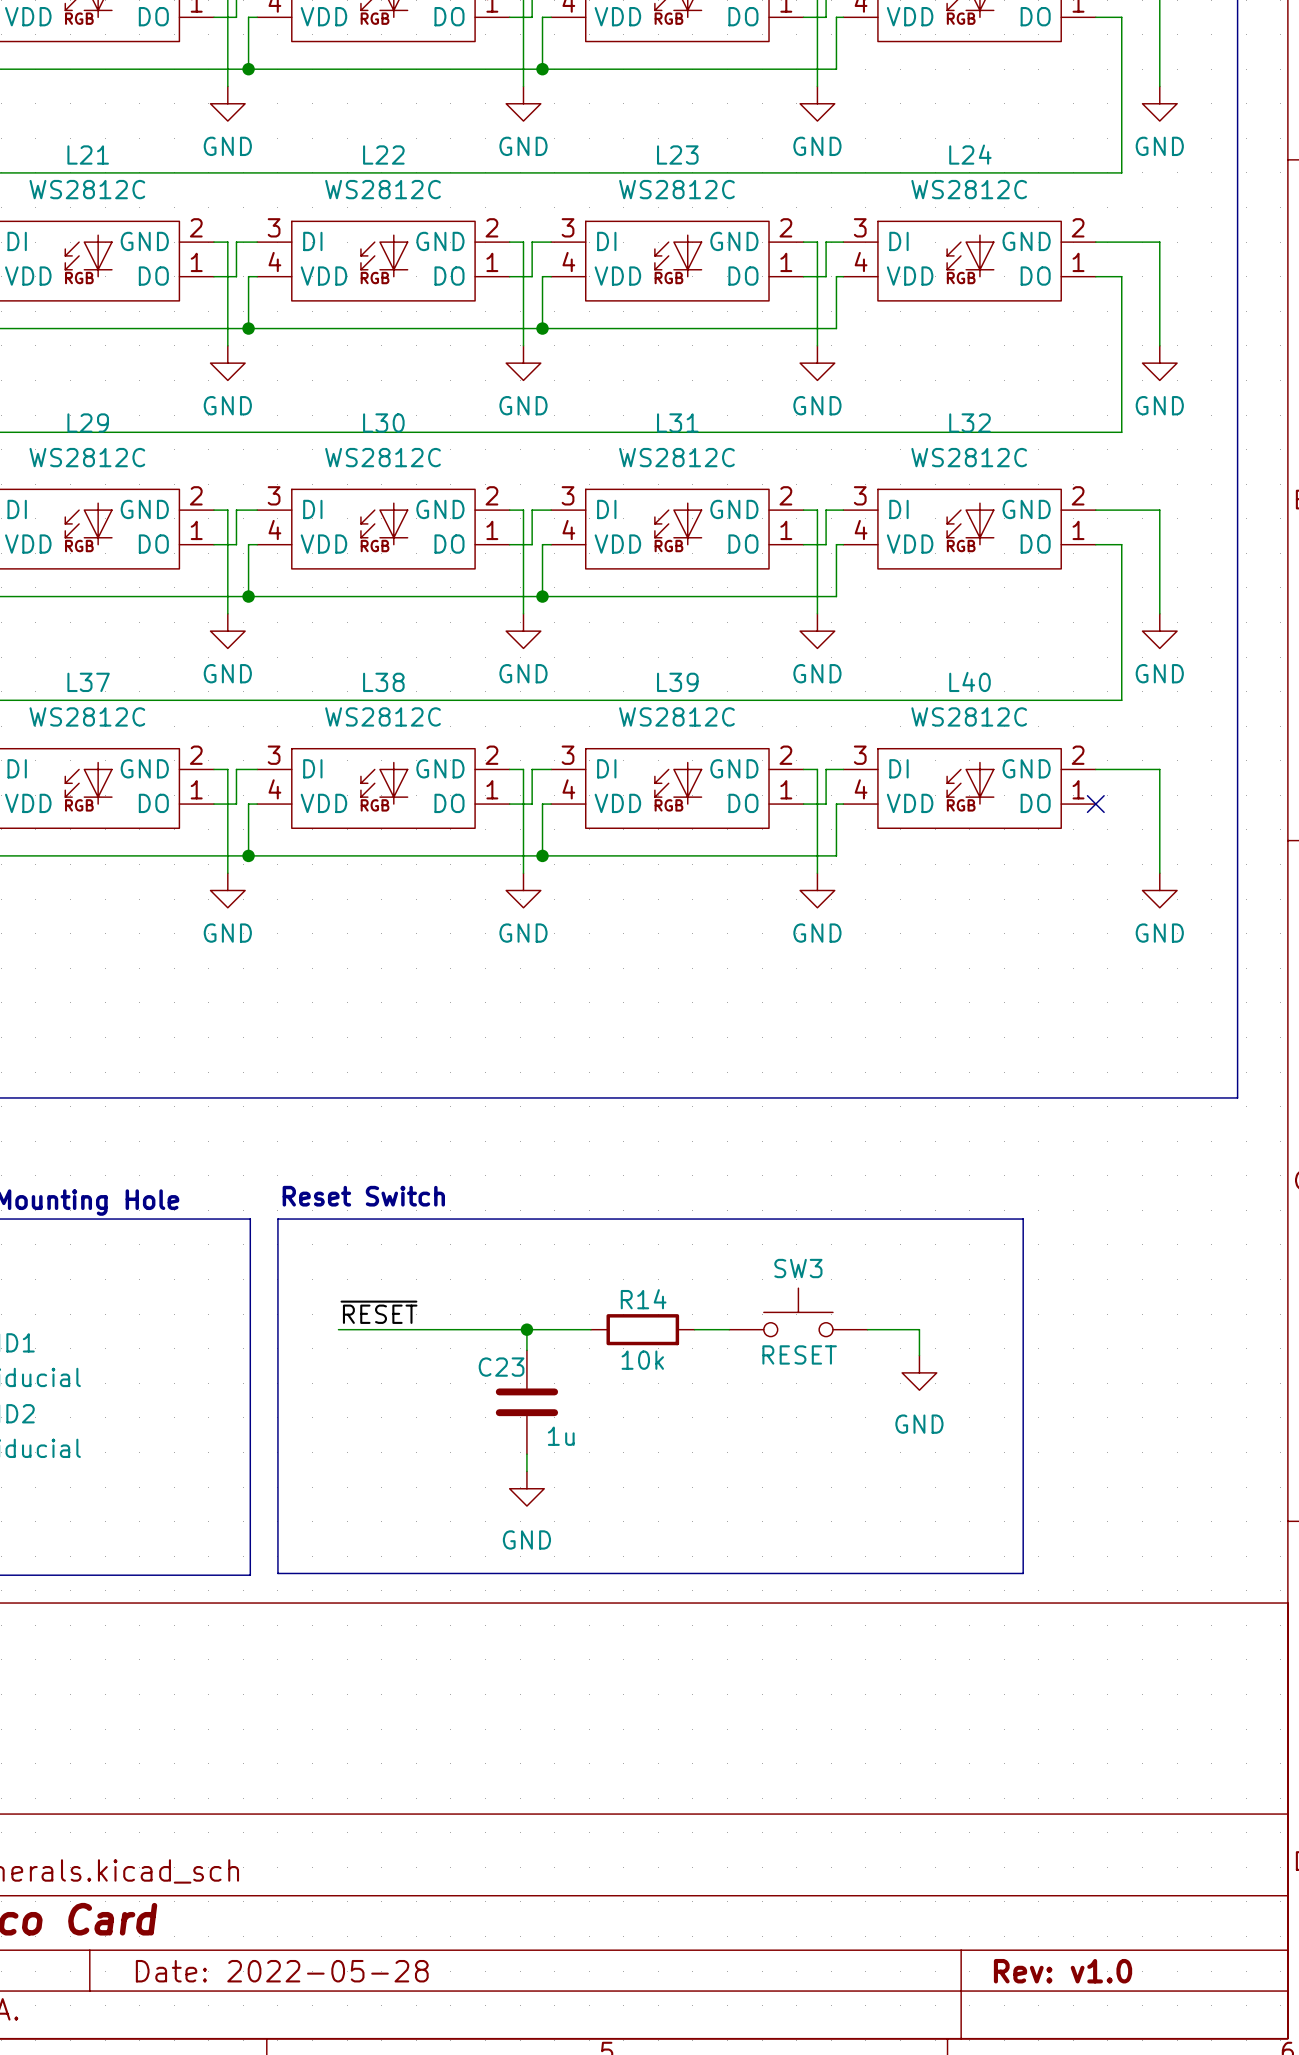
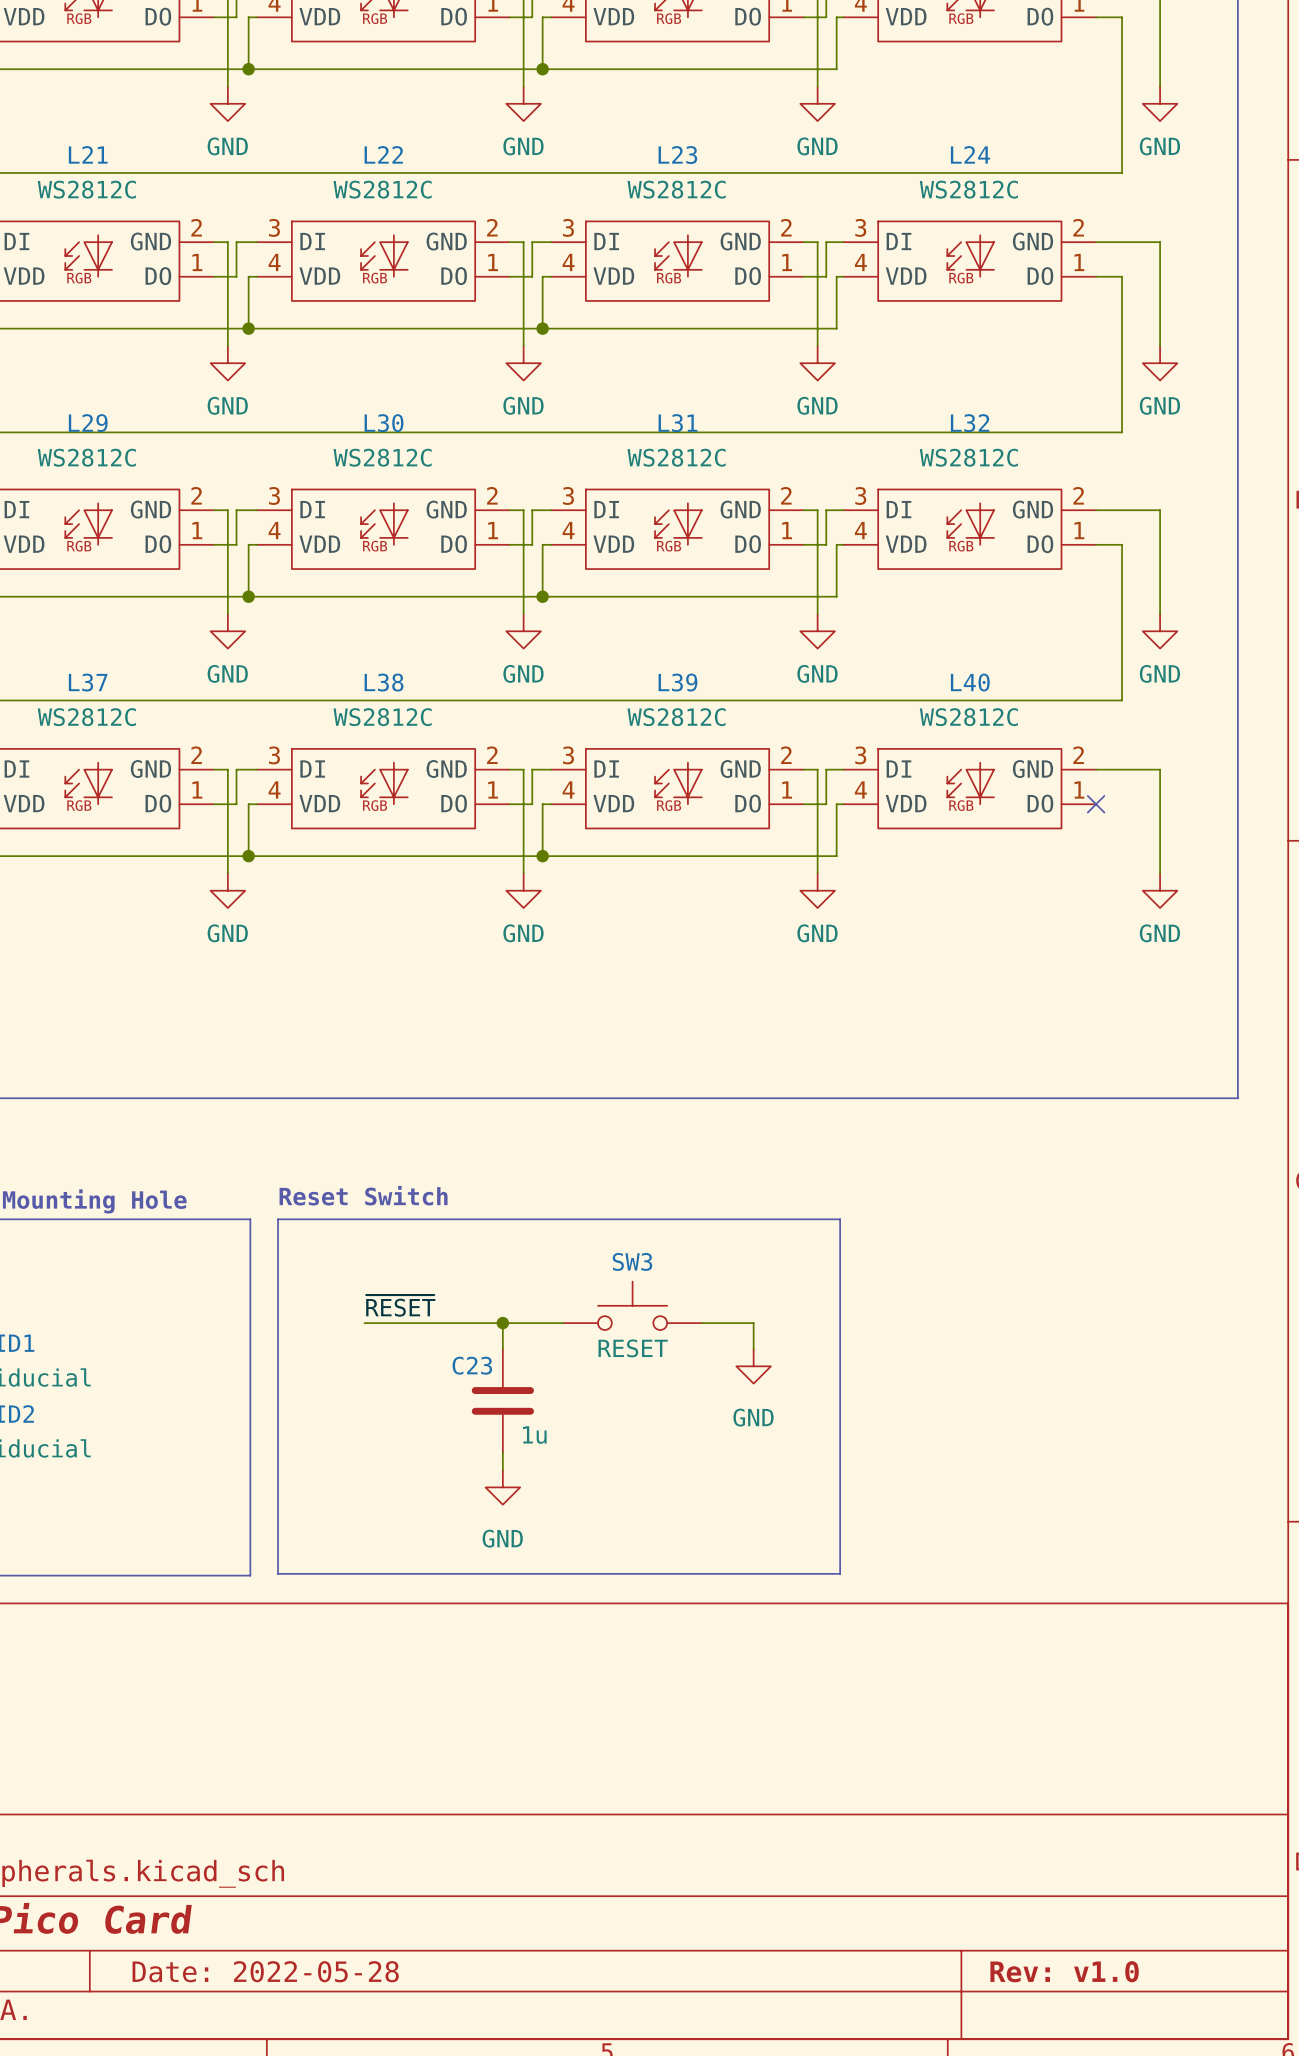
line: (839, 1219) (1023, 1219) (1023, 1573) (839, 1573) -> (840, 1219) (840, 1573)
label position: ~{RESET} (378, 1312) -> ~{RESET} (400, 1305)
SW3 position: (798, 1312) -> (632, 1305)
wire: none -> (364, 1323) (563, 1323)
wire: none -> (502, 1323) (502, 1349)
wire: (338, 1329) (590, 1329) -> none
wire: (526, 1329) (526, 1350) -> none
junction position: (526, 1329) -> (502, 1323)
R14: 10k (642, 1329) -> none
wire: (694, 1329) (729, 1329) -> none
wire: (867, 1329) (919, 1329) (919, 1355) -> (701, 1323) (753, 1323) (753, 1349)
power symbol: none -> GND (753, 1366)
power symbol: GND (919, 1372) -> none
C23 position: (526, 1402) -> (502, 1400)
wire: (526, 1454) (526, 1471) -> (502, 1452) (502, 1470)
power symbol position: GND (526, 1488) -> GND (502, 1487)

